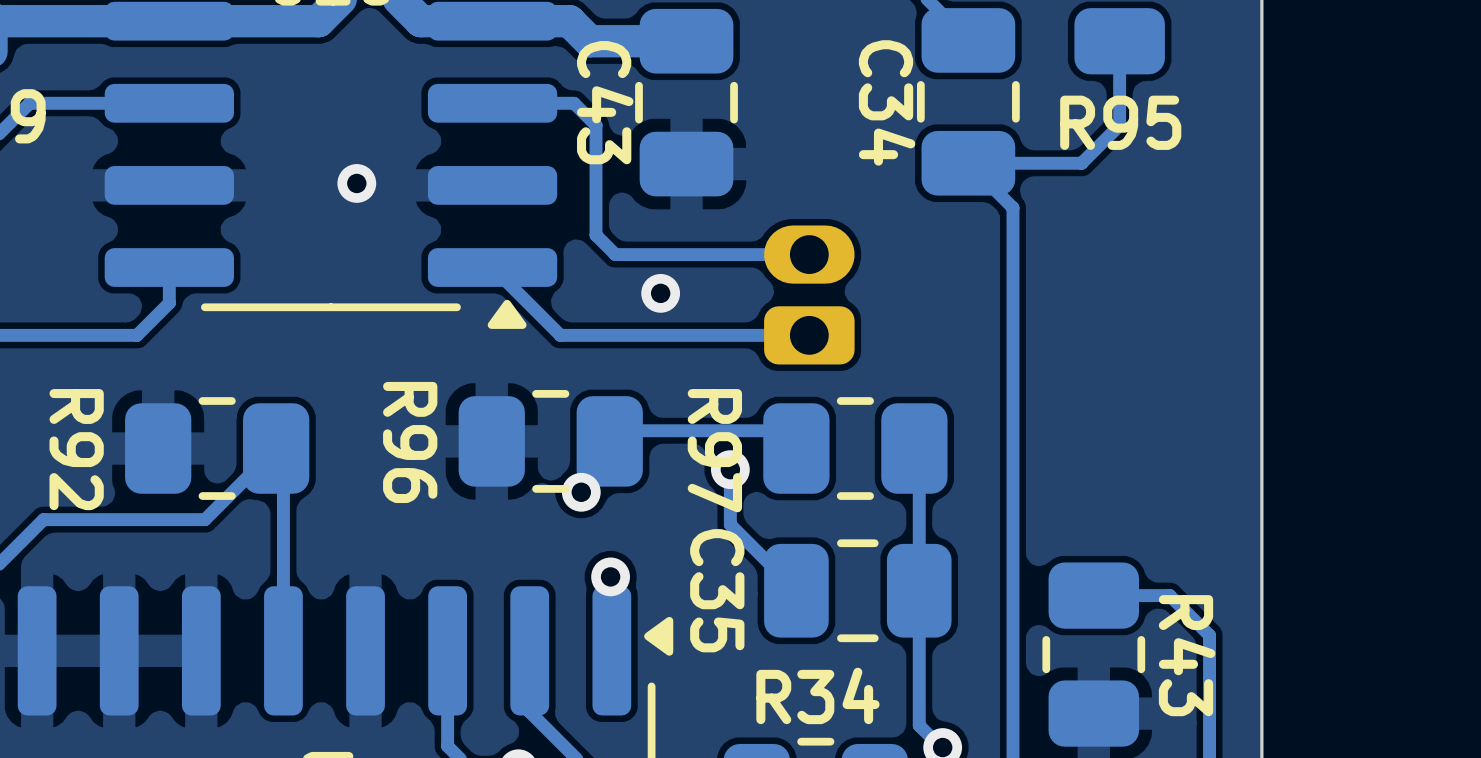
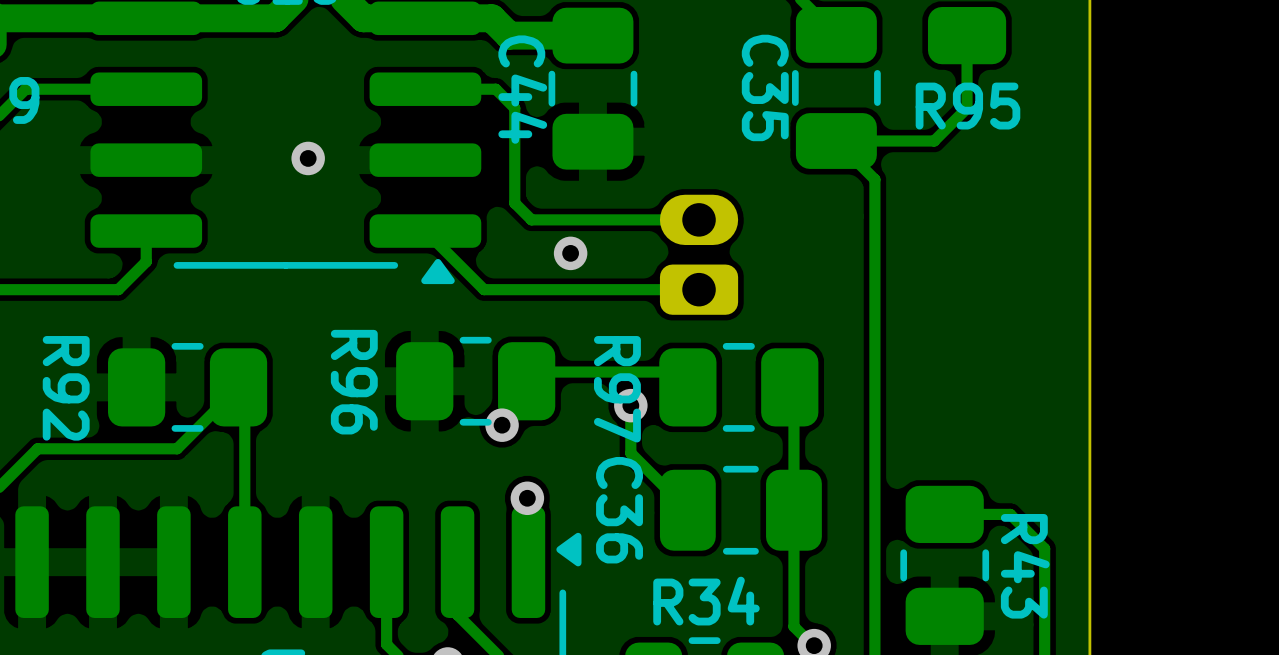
C43 name: C43 (605, 102) -> C44 (522, 89)
C34 name: C34 (887, 102) -> C35 (765, 87)
C35 name: C35 (717, 590) -> C36 (619, 510)

